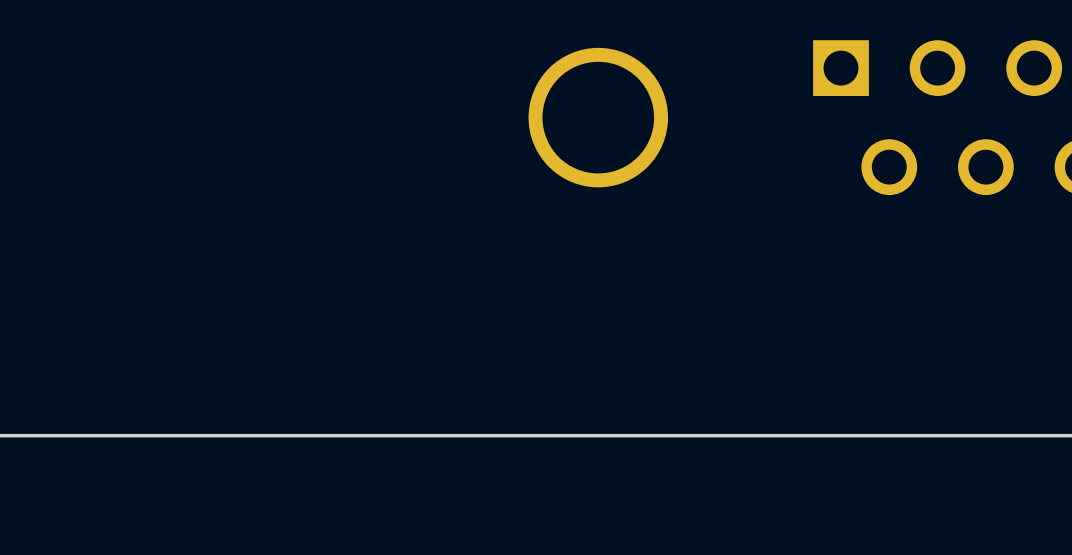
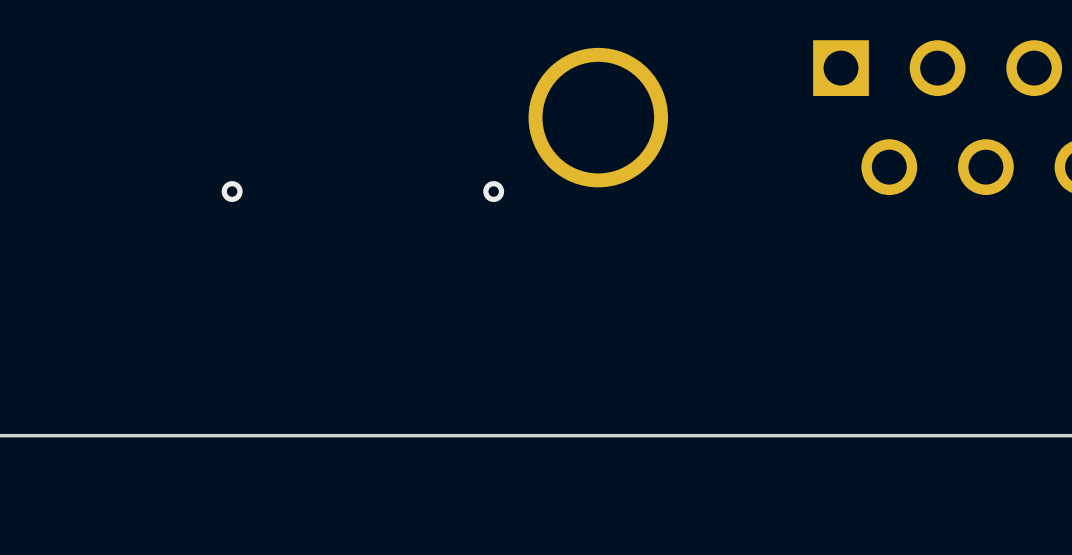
via: none -> (232, 191)
via: none -> (493, 191)

